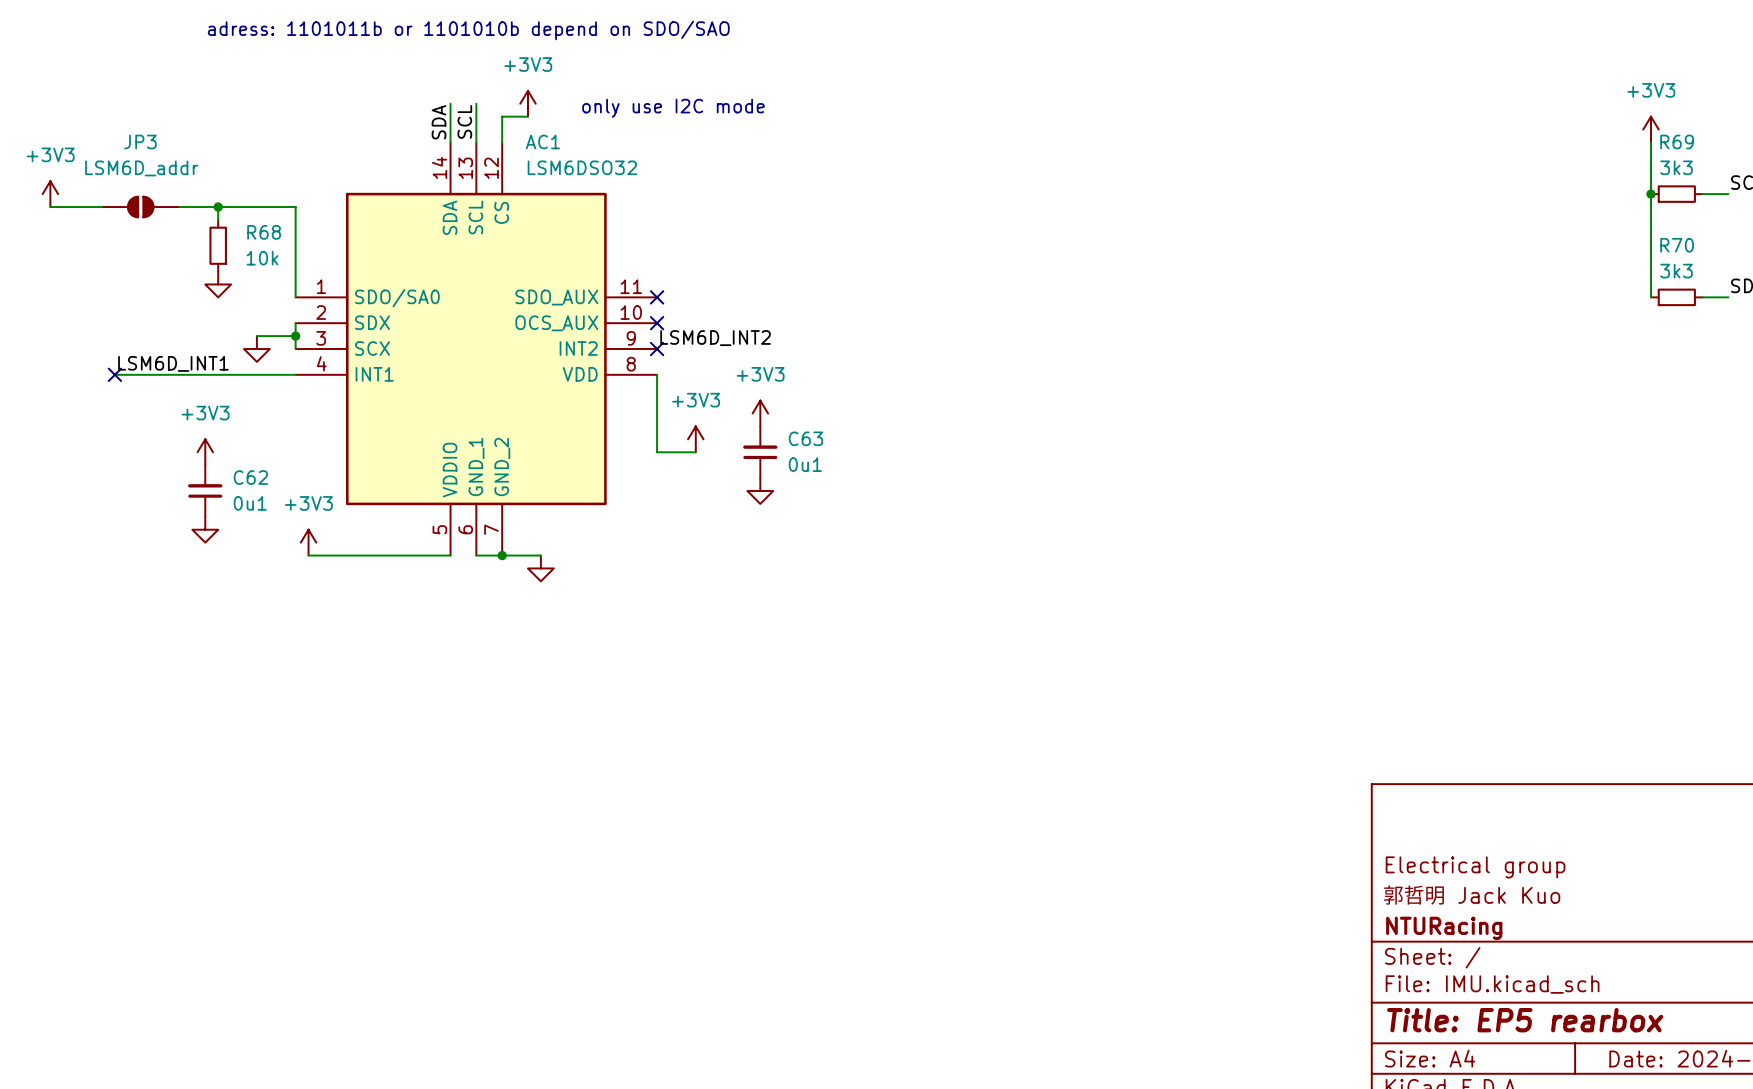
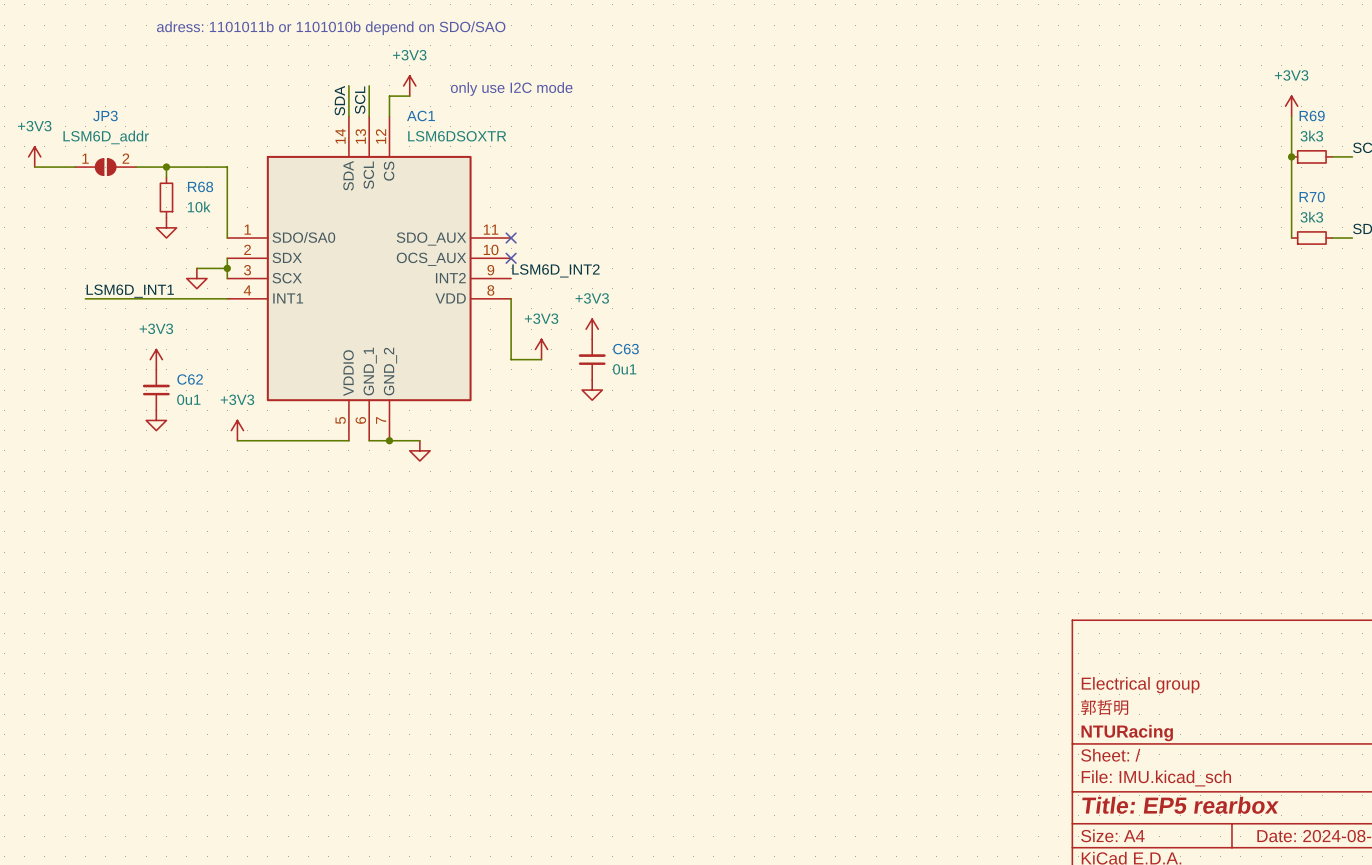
AC1 value: LSM6DSO32 (582, 167) -> LSM6DSOXTR (457, 136)
JP3 pin number: none -> 1 (85, 158)
JP3 pin number: none -> 2 (125, 158)
no-connect mark: (657, 349) -> none
no-connect mark: (114, 374) -> none
title block: 郭哲明 Jack Kuo (1471, 895) -> 郭哲明 (1104, 707)

